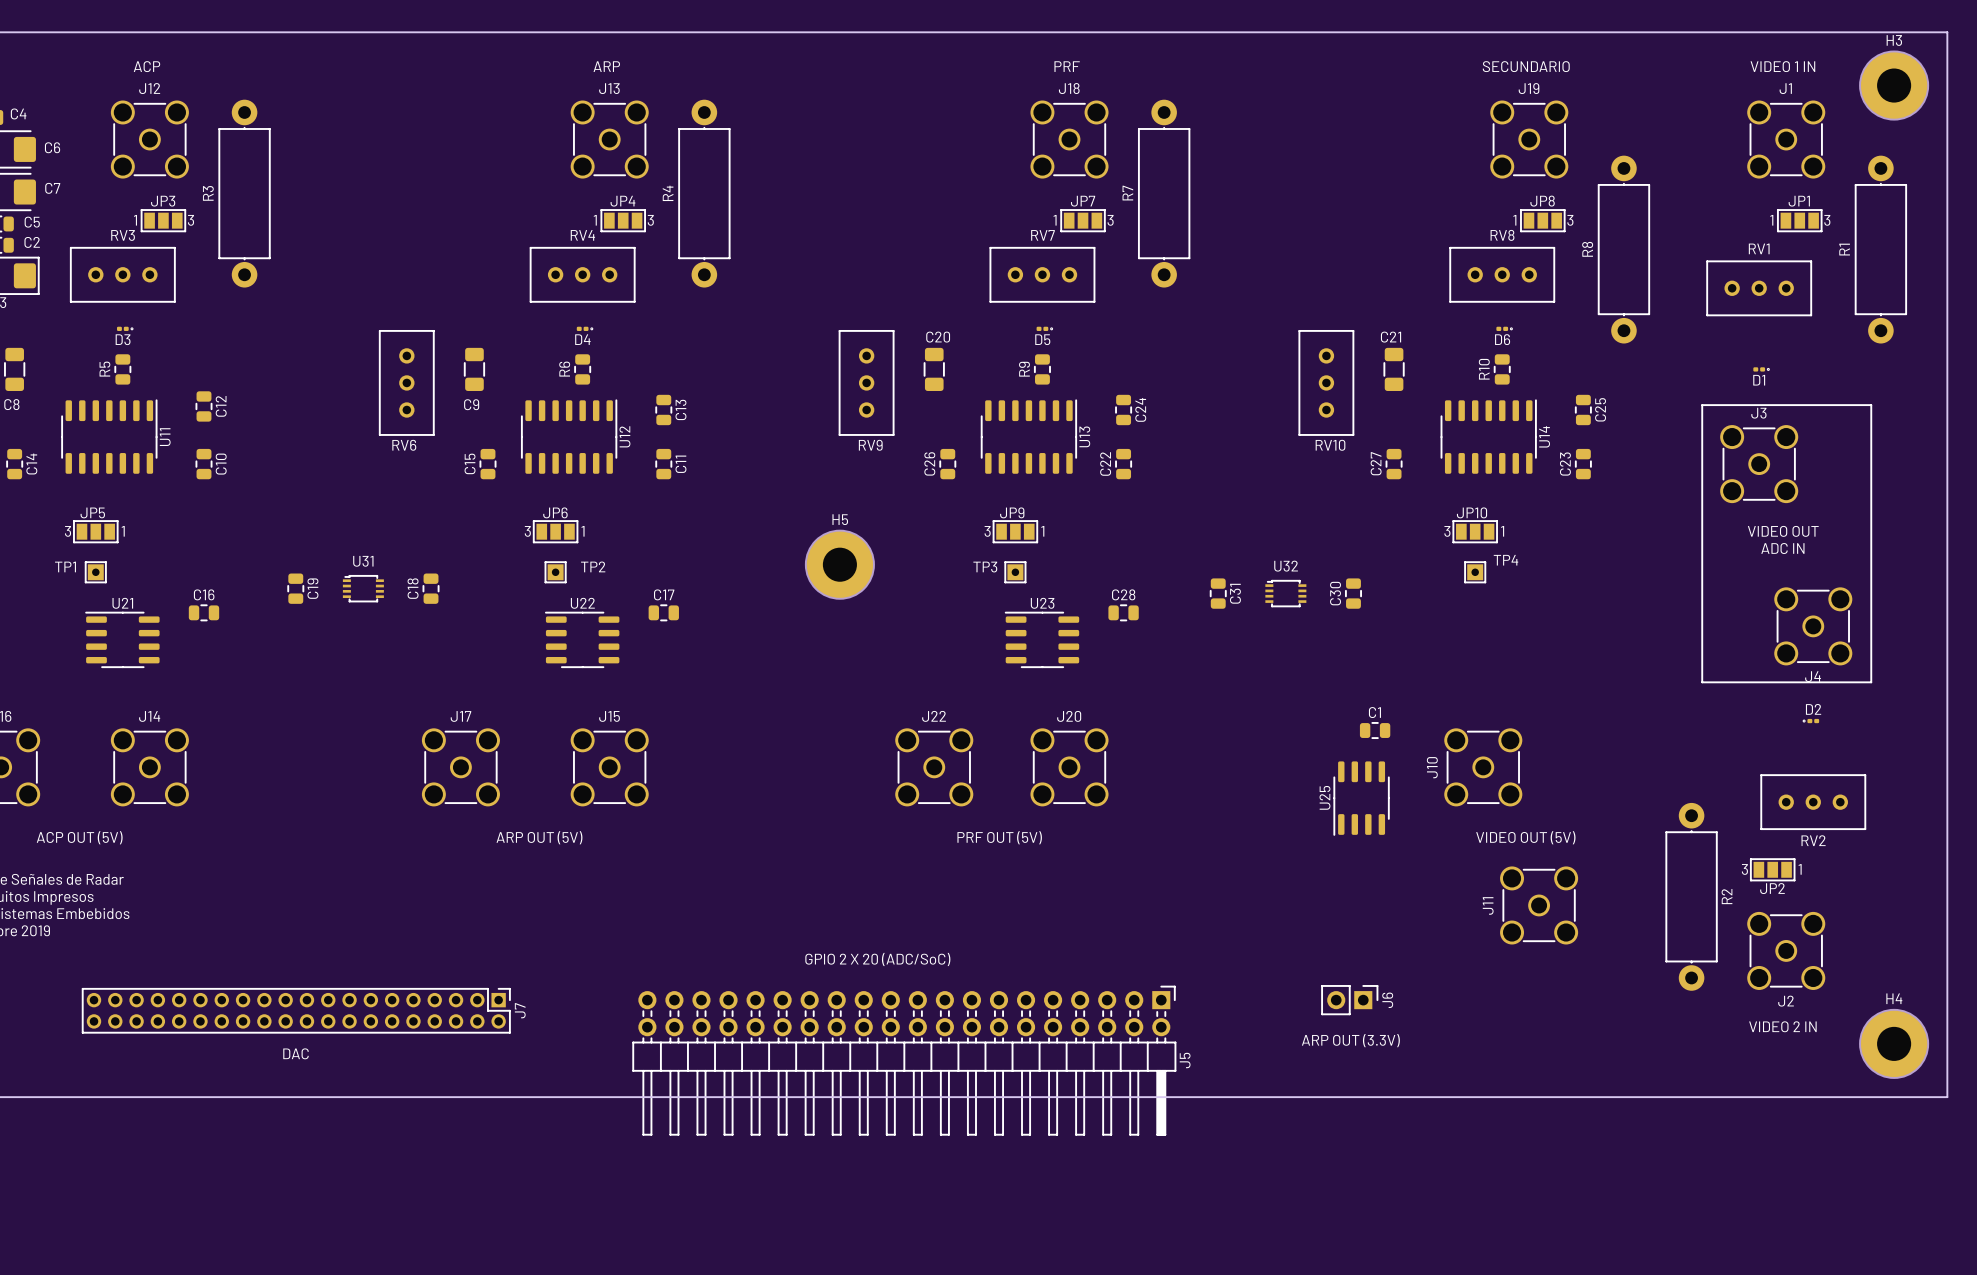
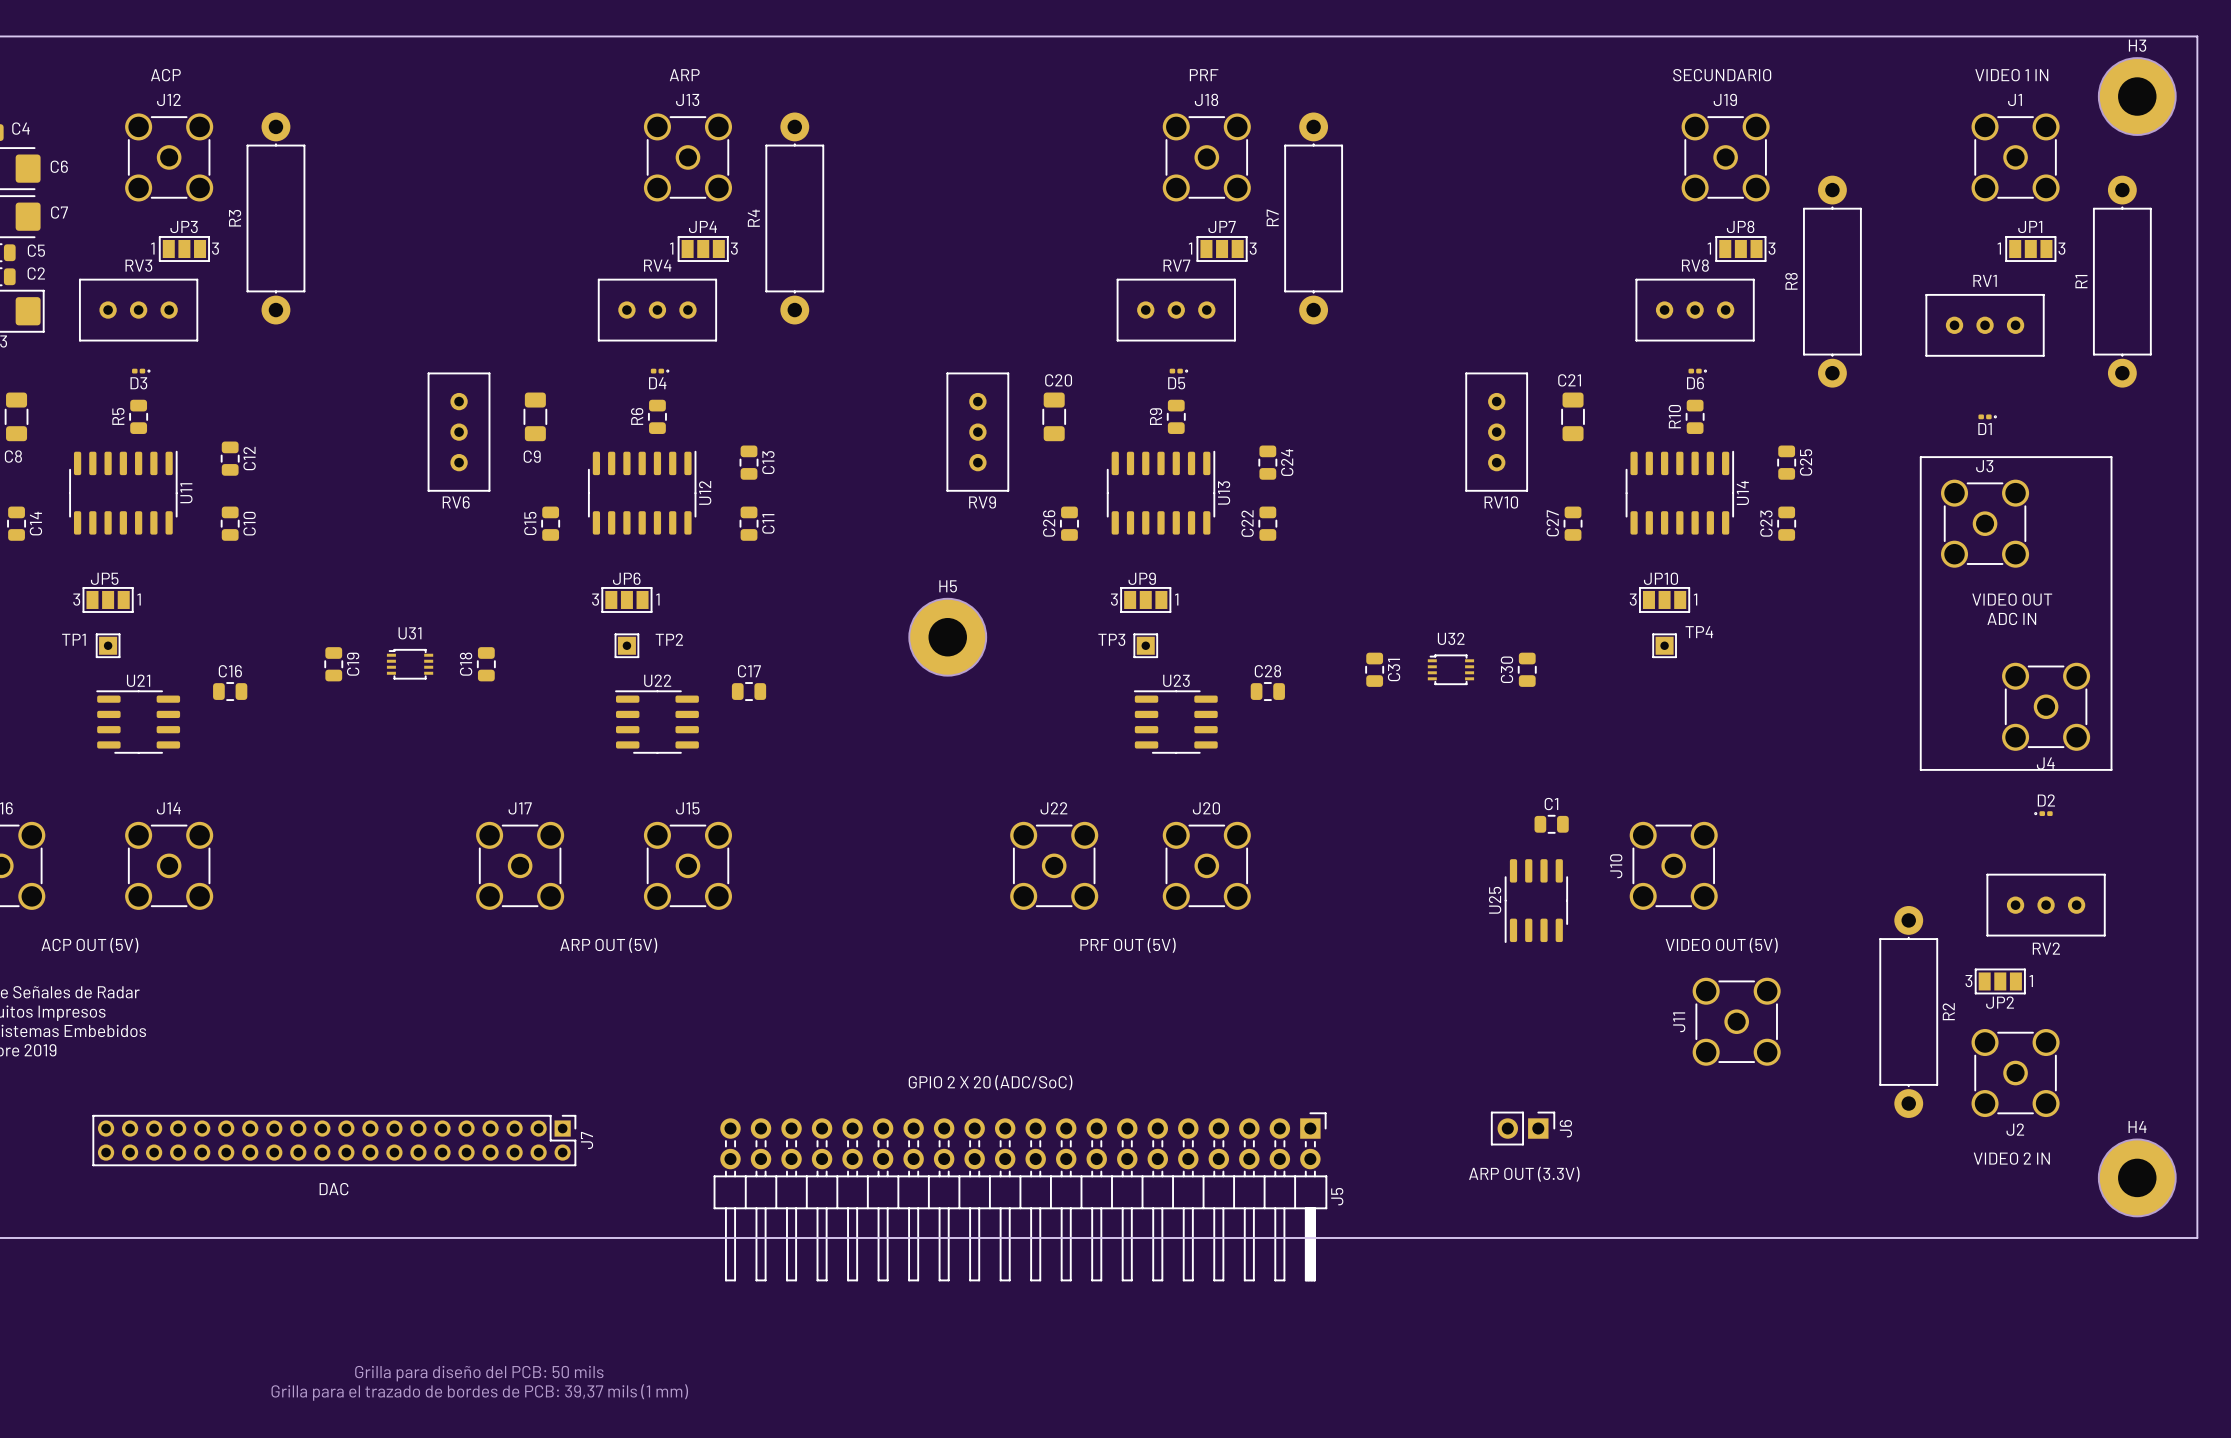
text: none -> Grilla para diseño del PCB: 50 mils (479, 1373)
text: none -> Grilla para el trazado de bordes de PCB: 39,37 mils (1 mm) (479, 1392)

